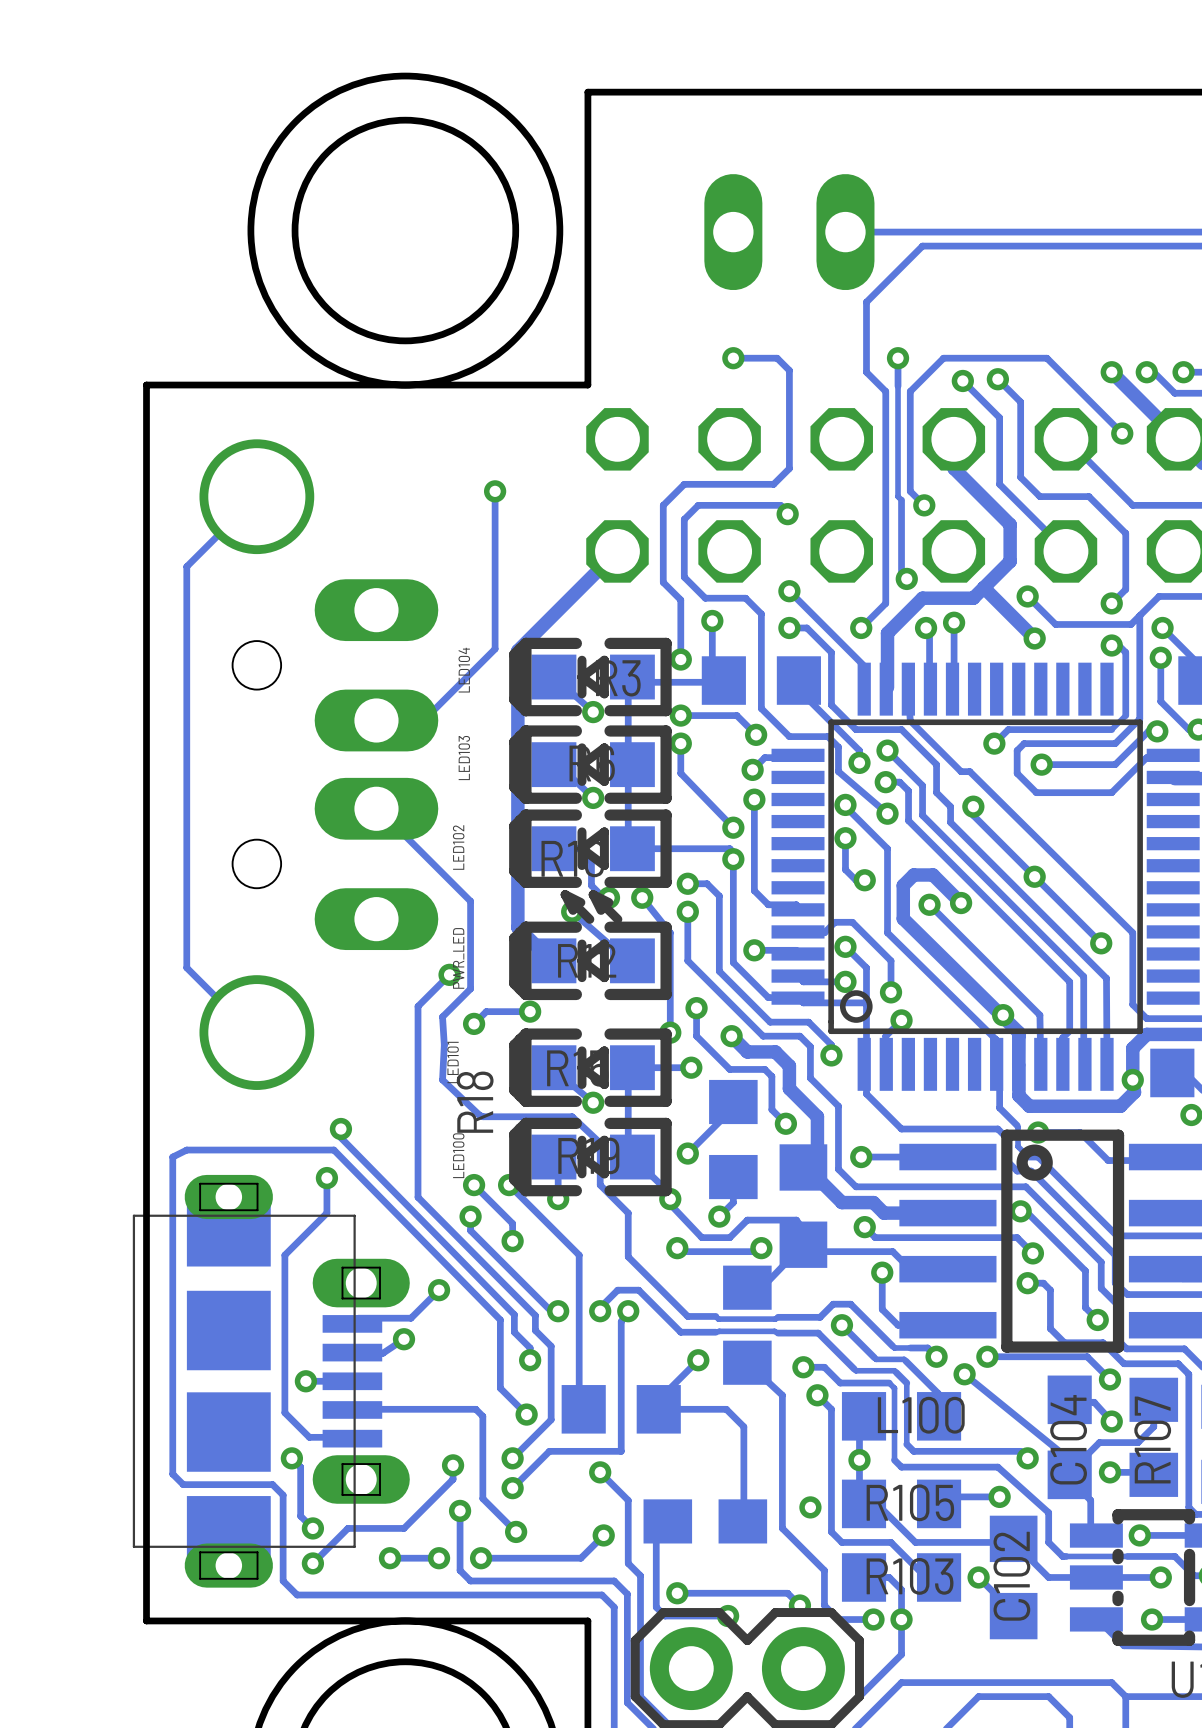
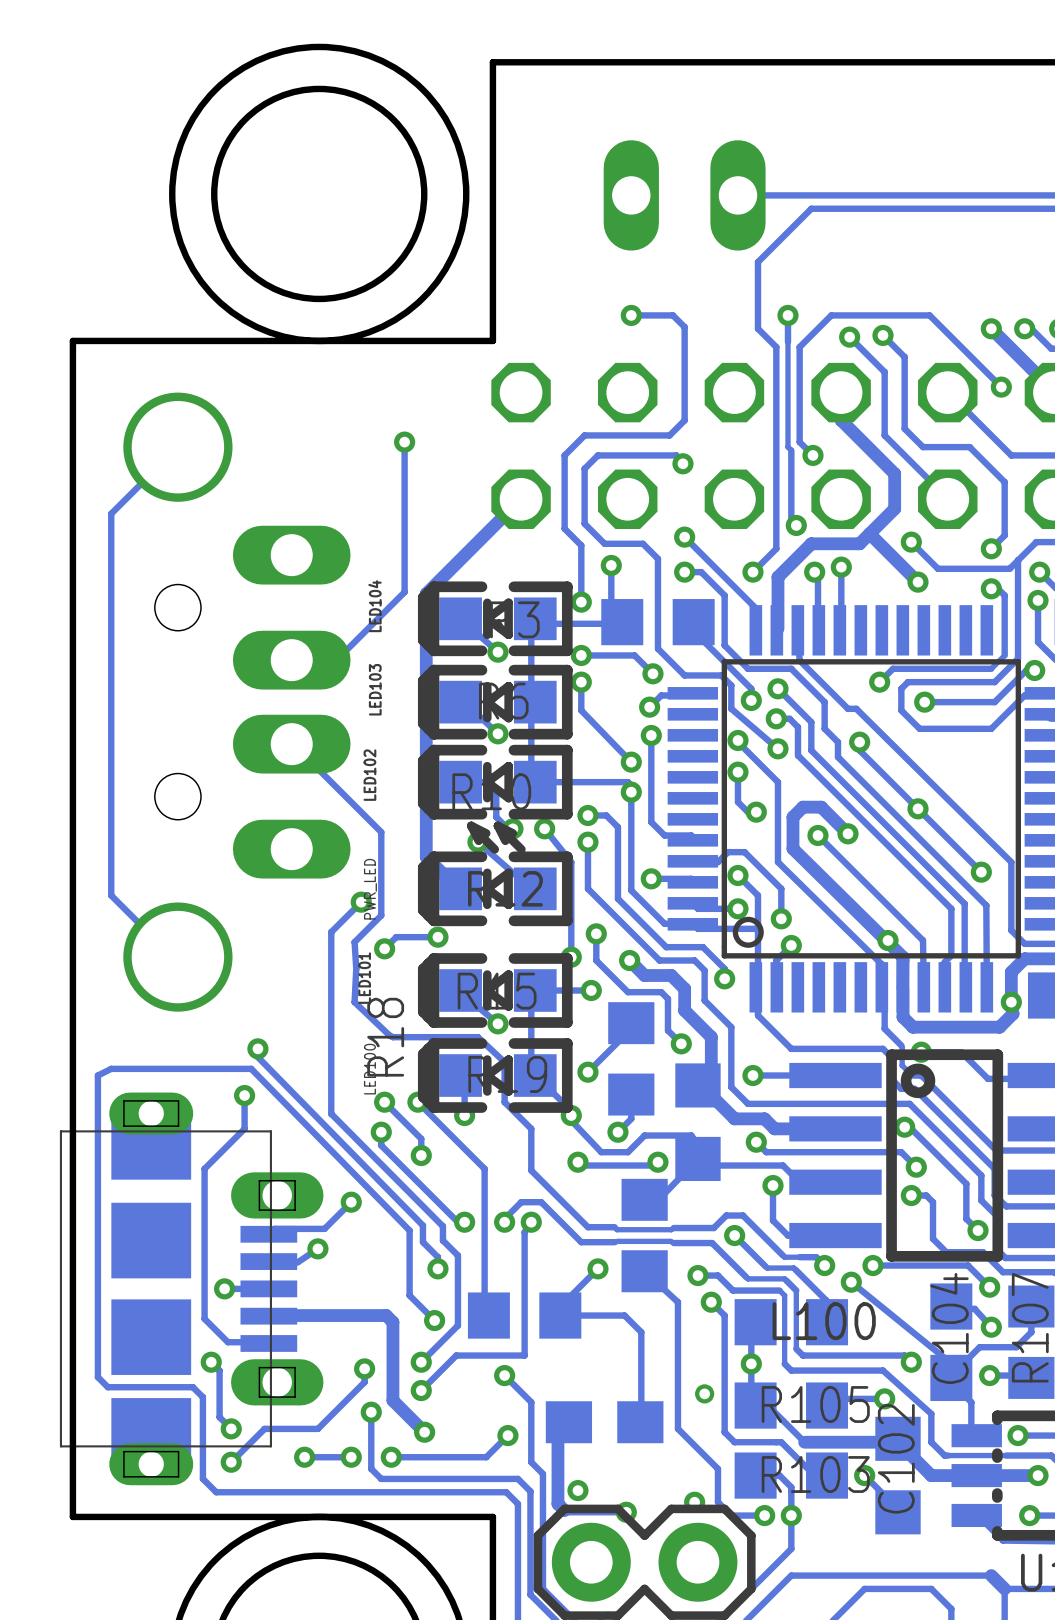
track width: thin (353, 1409) (475, 1409) (482, 1416) (482, 1498) (516, 1531) -> thick (269, 1315) (386, 1315) (392, 1322) (392, 1400) (424, 1432)
via position: (810, 1507) -> (704, 1393)
track width: thin (656, 1537) (656, 1607) (663, 1614) -> thick (557, 1437) (557, 1503) (564, 1510)
track width: thin (915, 1542) (1013, 1542) (1048, 1577) (1160, 1577) -> thick (804, 1442) (898, 1442) (931, 1475) (1038, 1475)
track: (677, 1593) (787, 1593) (799, 1605) -> none
track width: thin (1111, 1682) (1125, 1696) -> thick (991, 1575) (1004, 1588)

